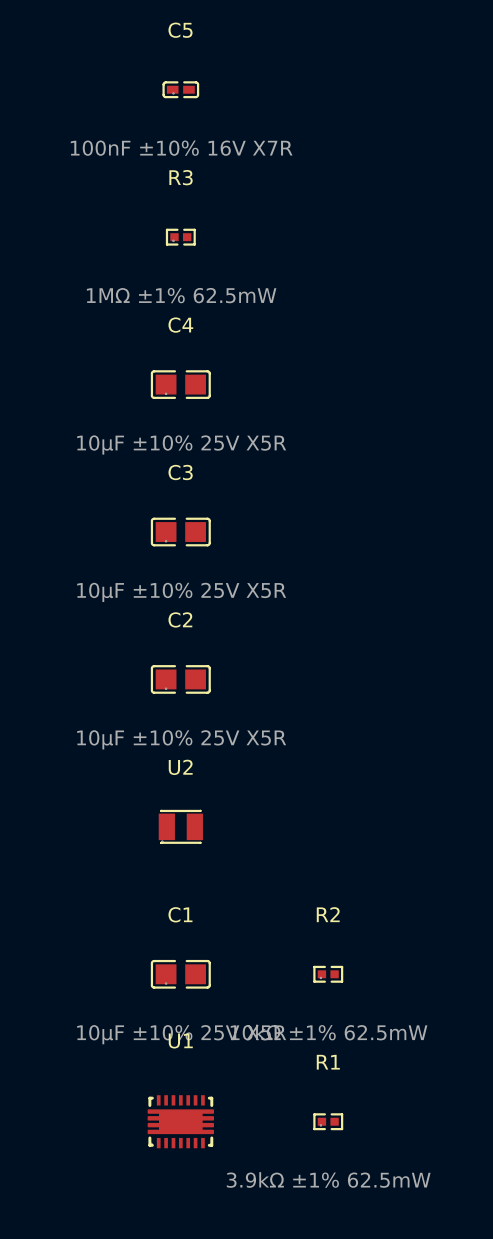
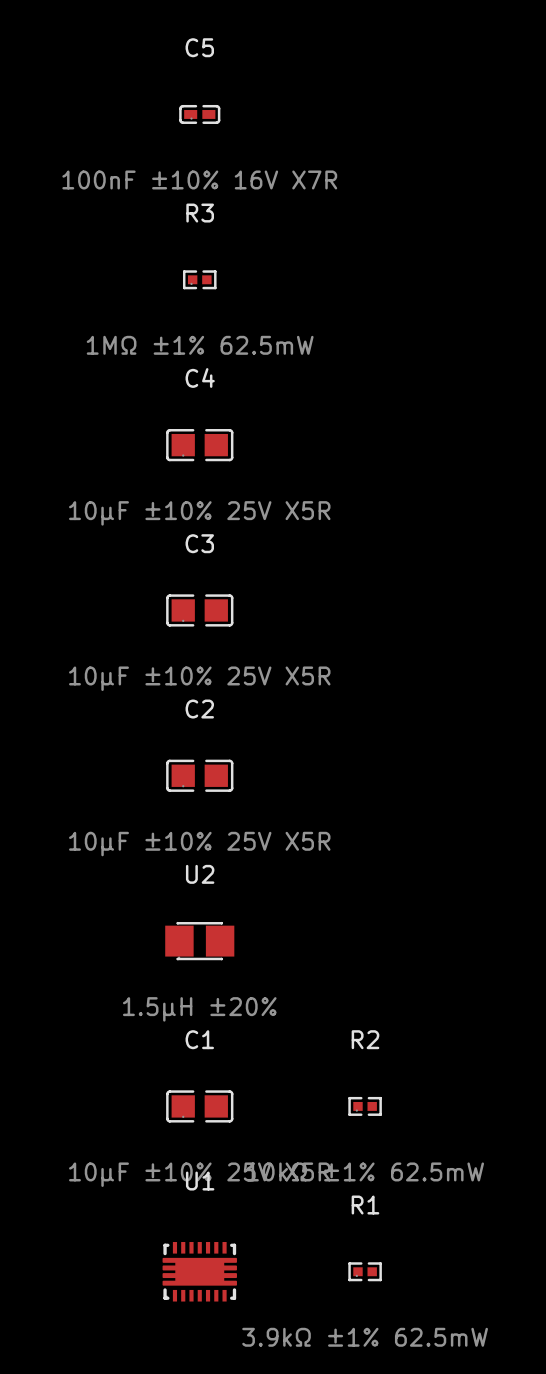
U2 footprint: [158, 809, 203, 845] -> [165, 921, 235, 961]
U2 value: none -> 1.5µH ±20% (199, 1009)

